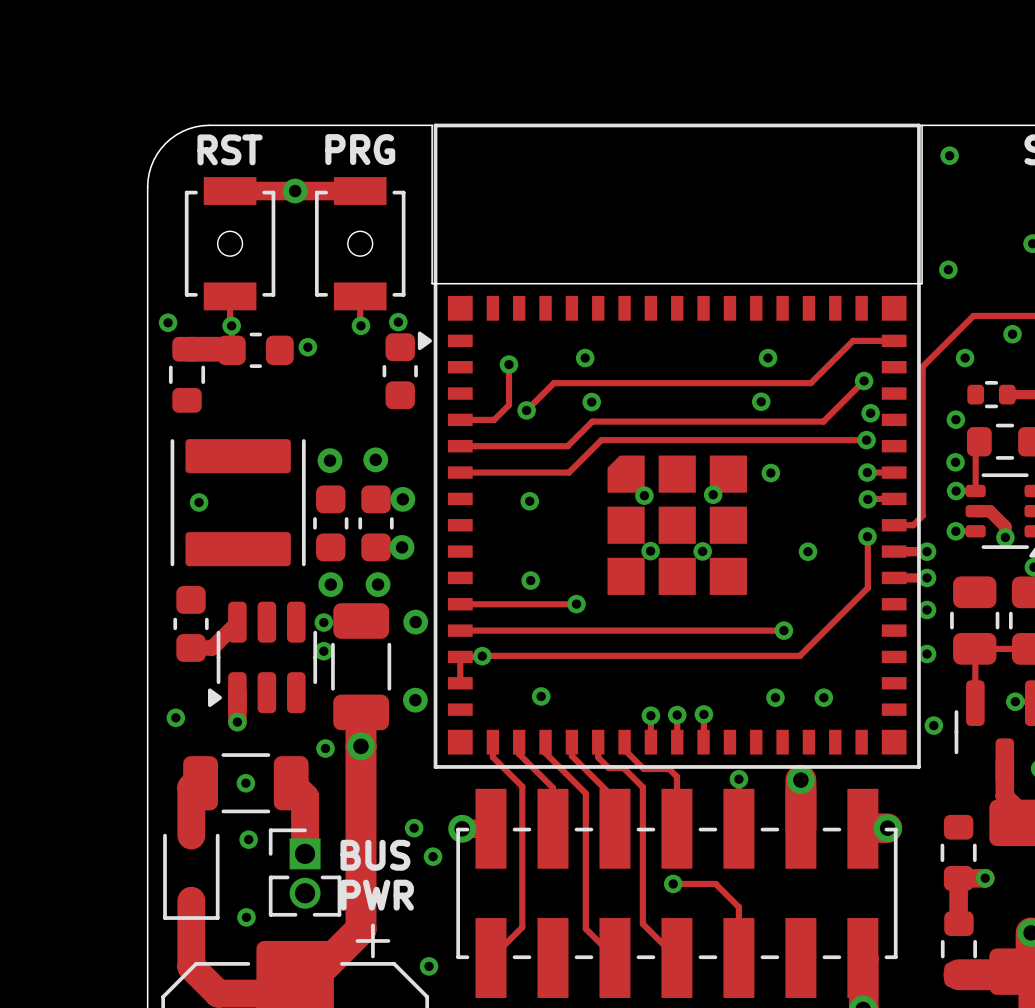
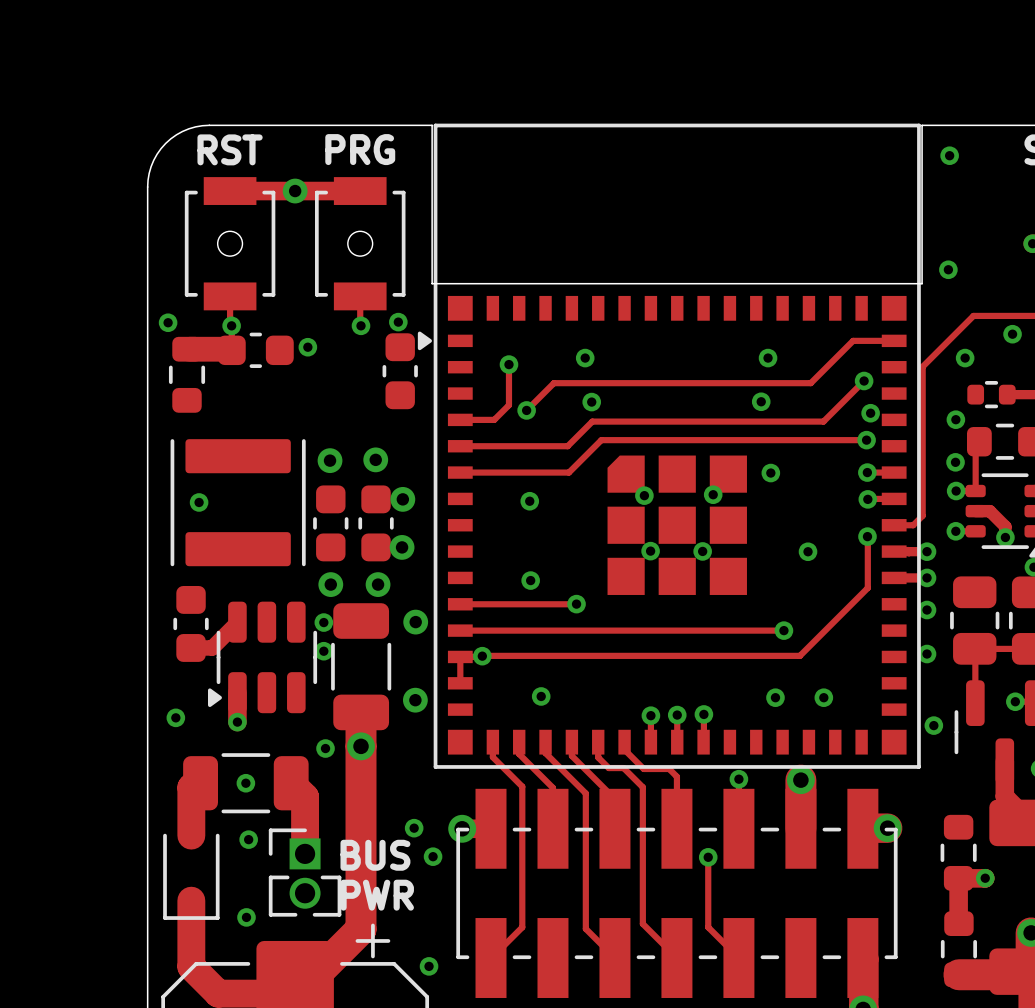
track: (673, 883) (715, 883) (738, 907) (738, 958) -> (708, 857) (708, 927) (738, 958)
via position: (673, 883) -> (708, 857)

